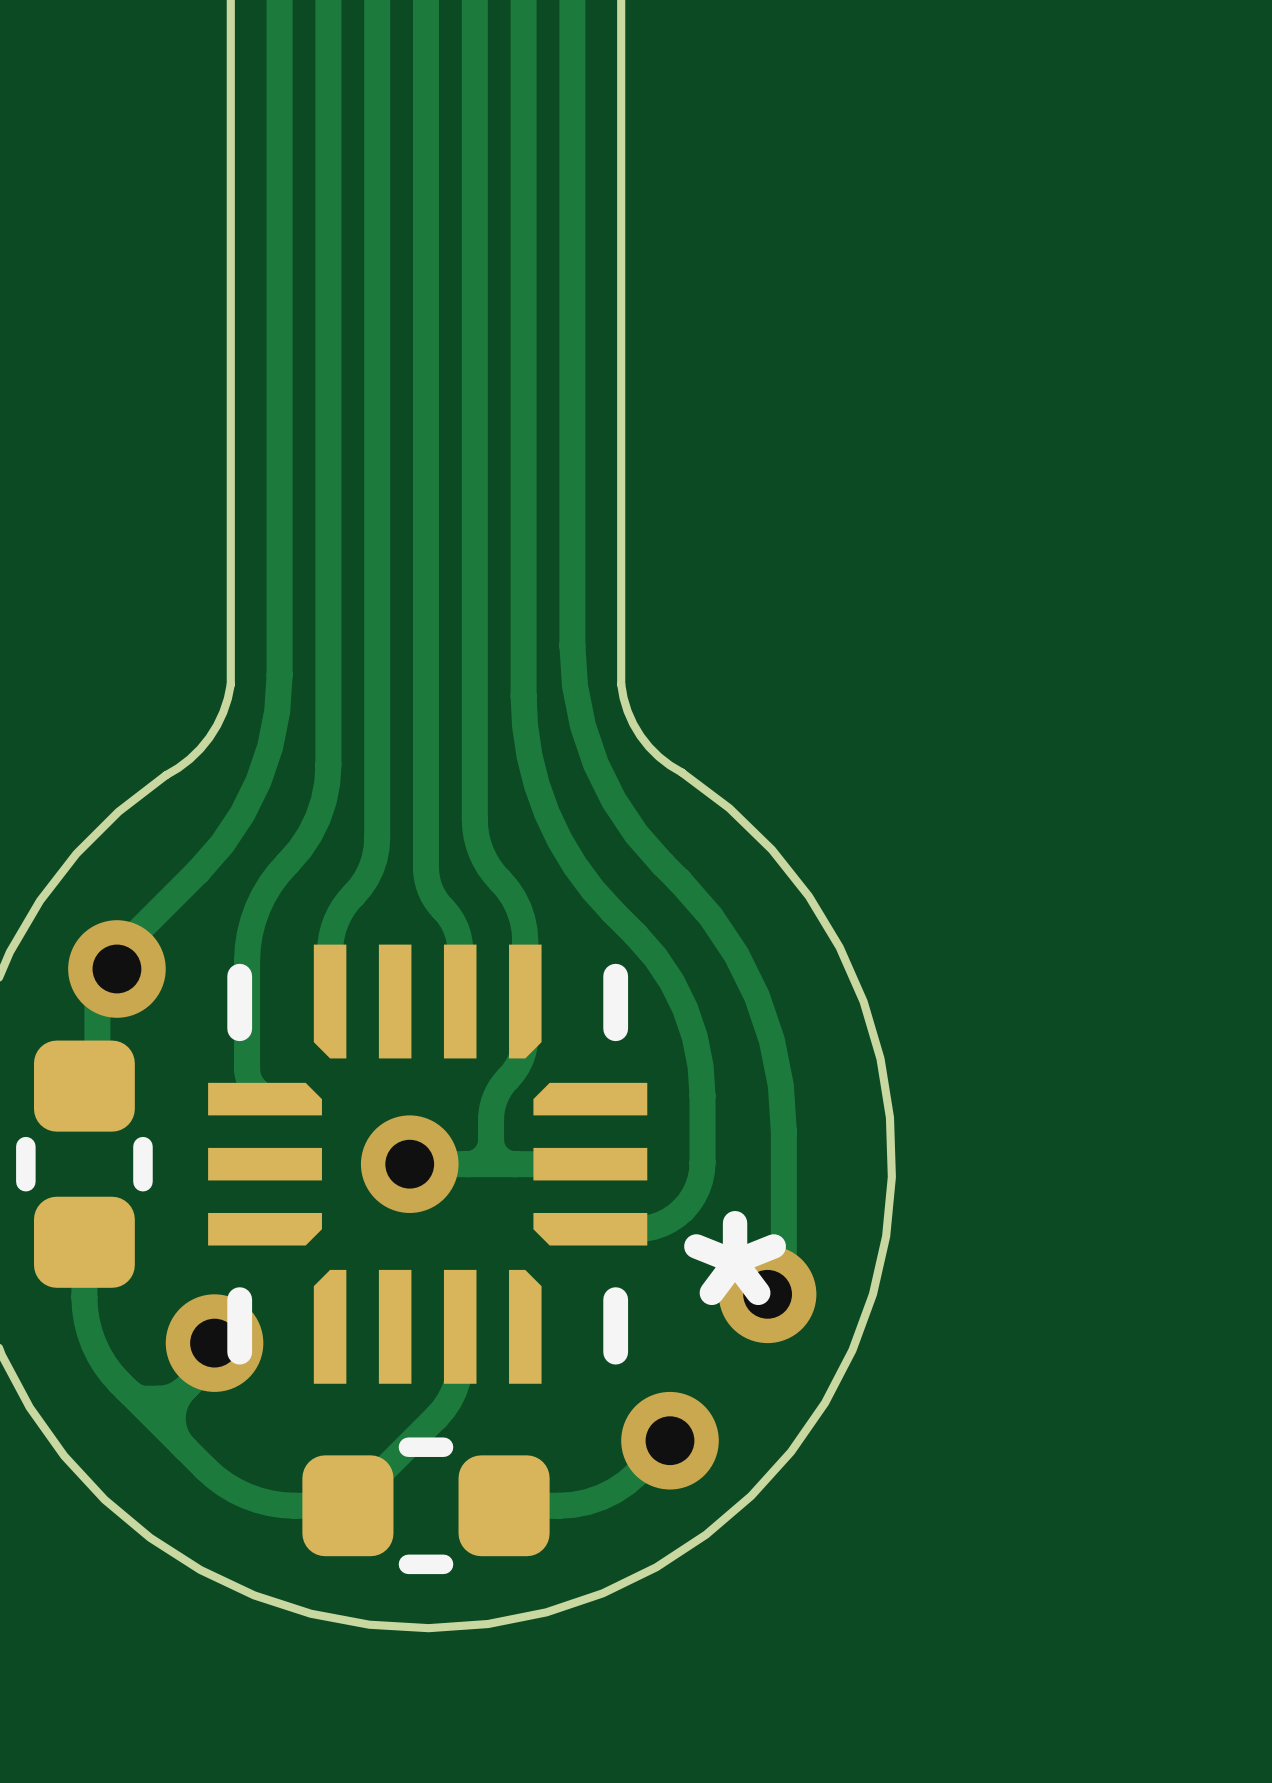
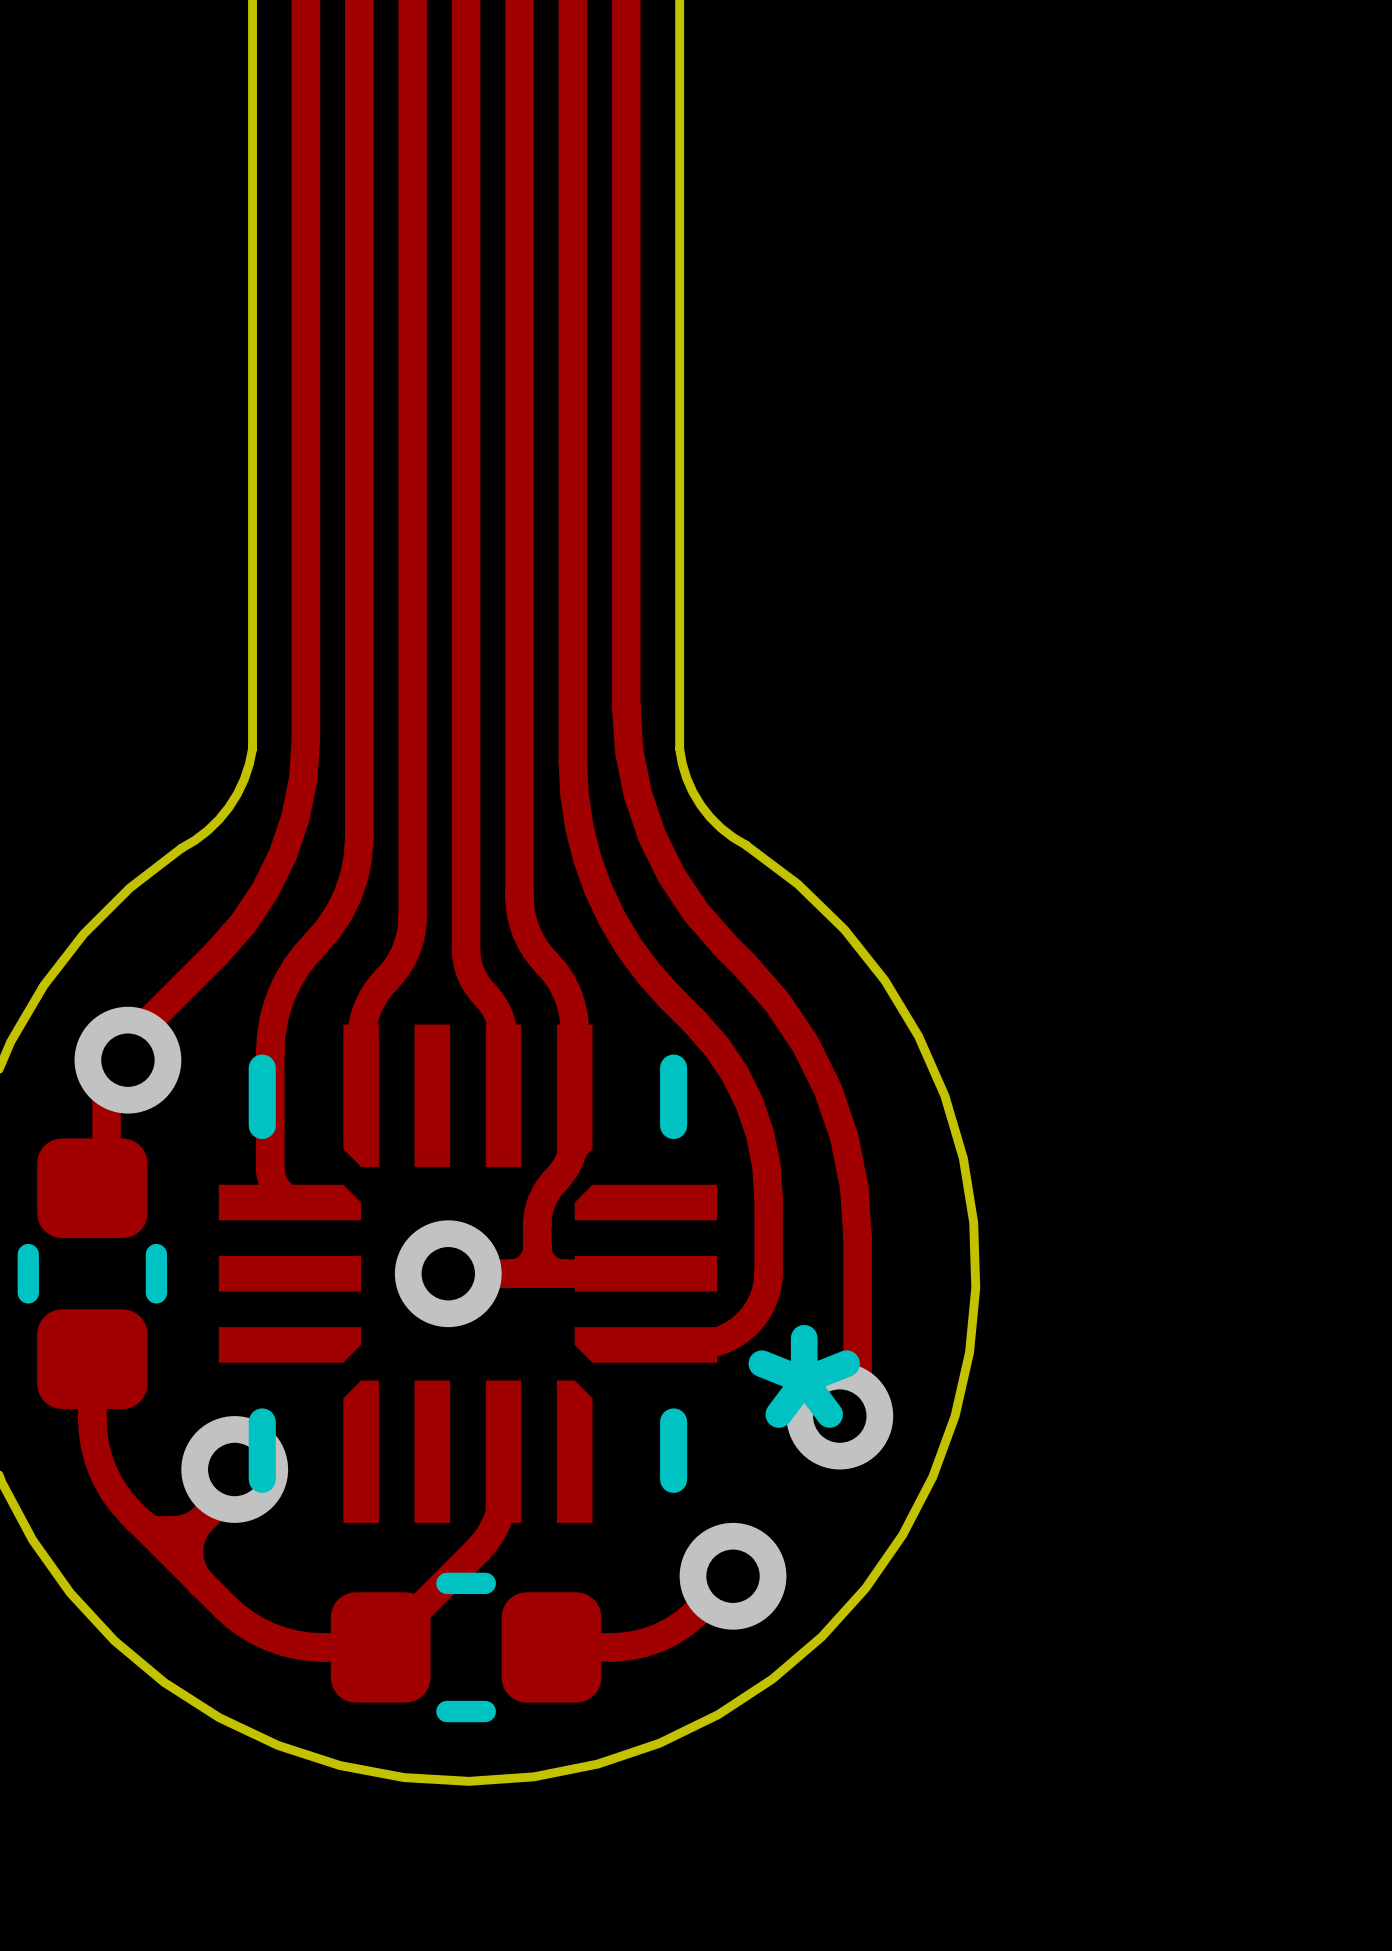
part footprint: [208, 944, 648, 1384] -> [218, 1024, 718, 1523]

